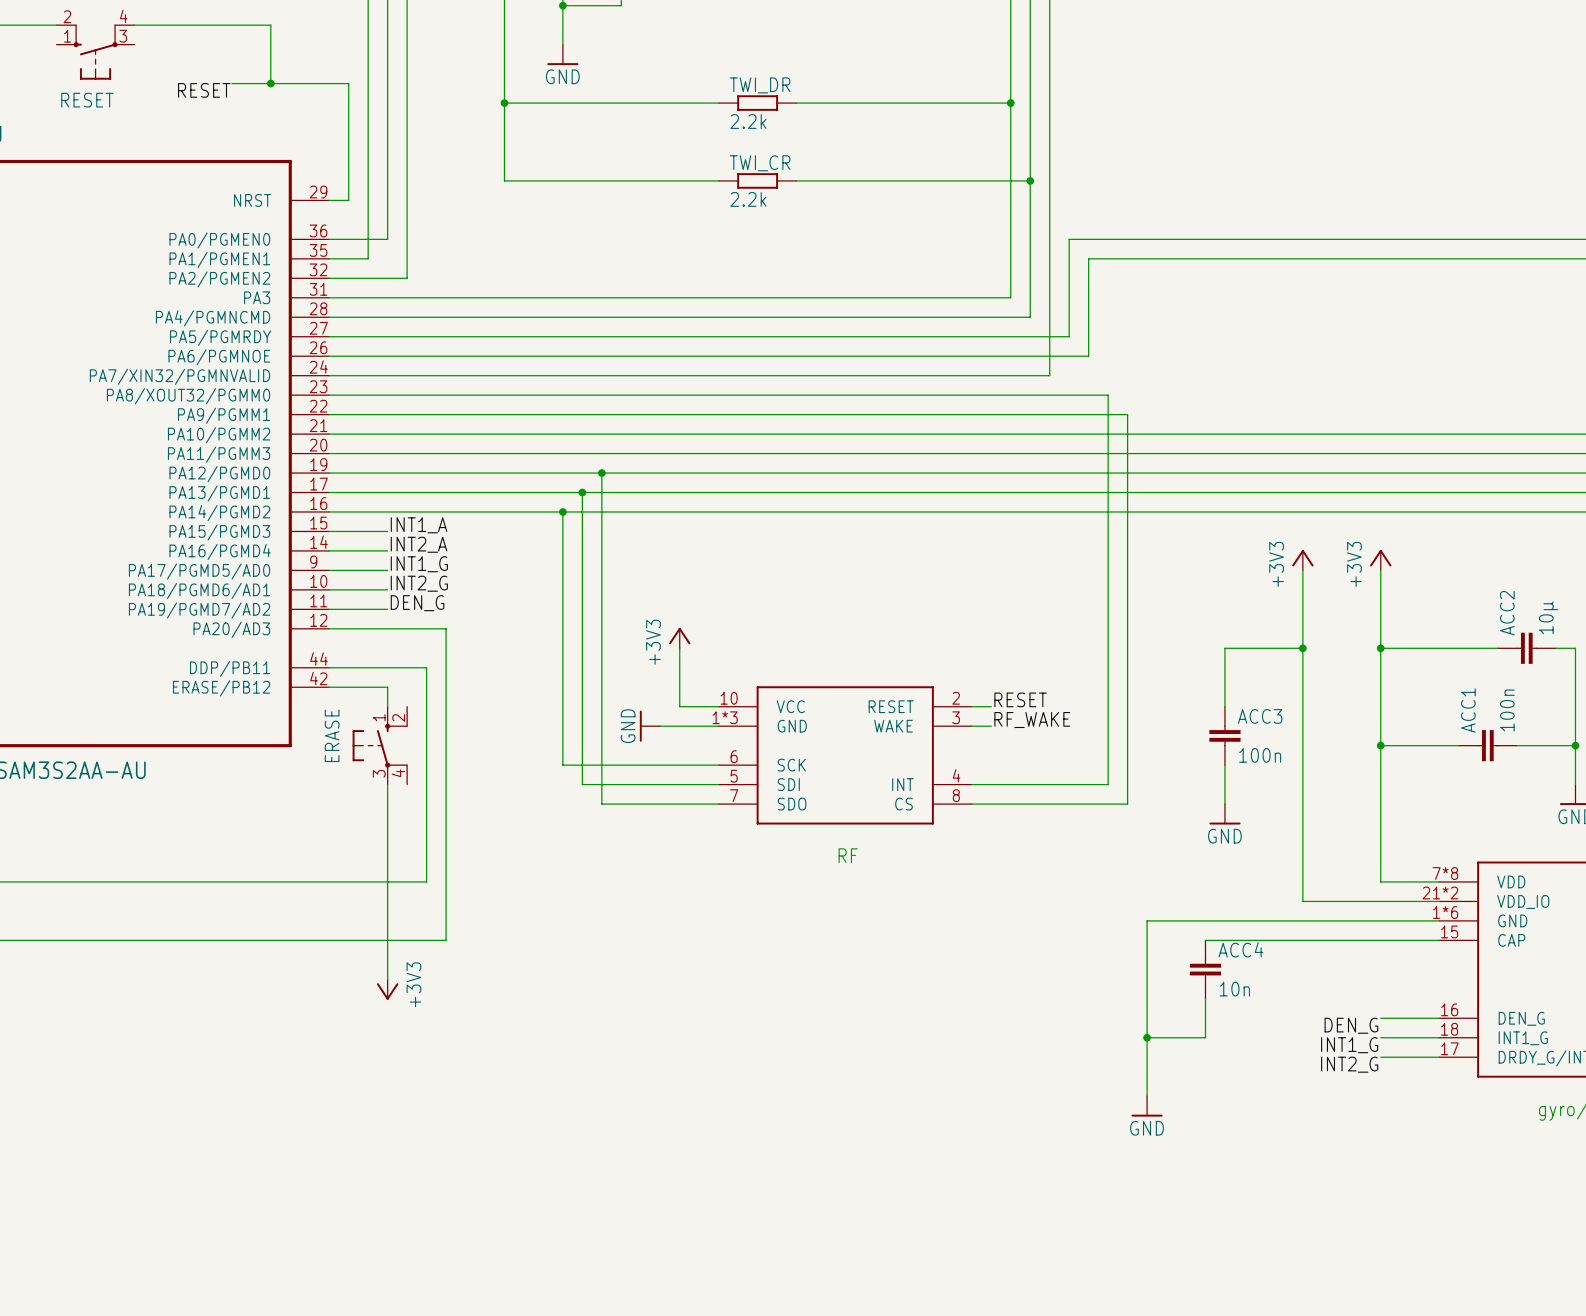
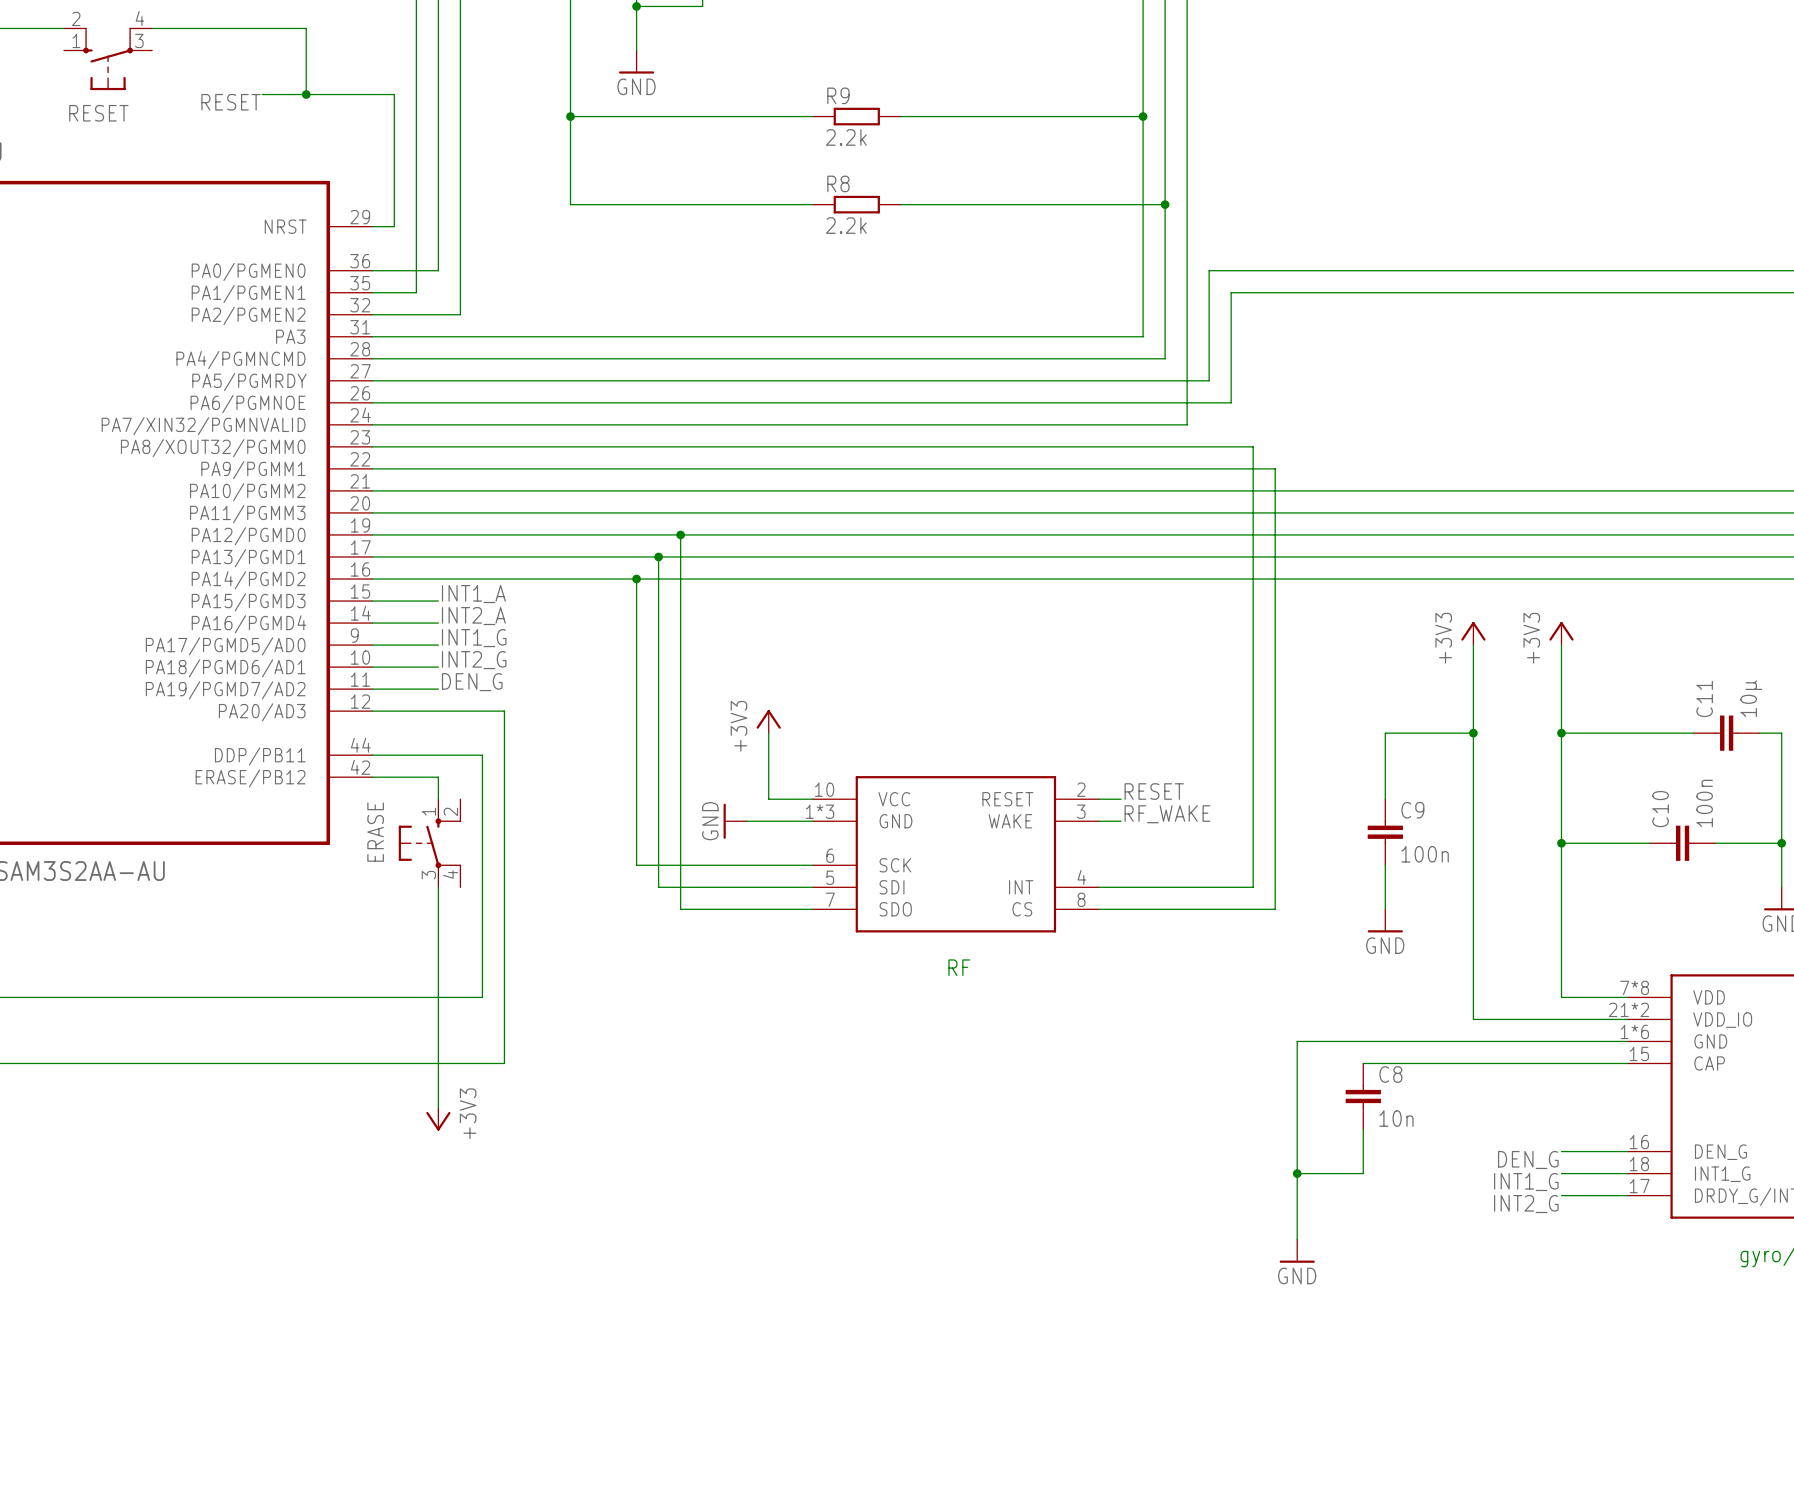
TWI_DR name: TWI_DR (760, 85) -> R9 (838, 95)
TWI_CR name: TWI_CR (760, 163) -> R8 (838, 183)
ACC2 name: ACC2 (1507, 613) -> C11 (1704, 698)
ACC1 name: ACC1 (1468, 710) -> C10 (1660, 809)
ACC3 name: ACC3 (1260, 716) -> C9 (1412, 810)
ACC4 name: ACC4 (1240, 949) -> C8 (1390, 1074)

